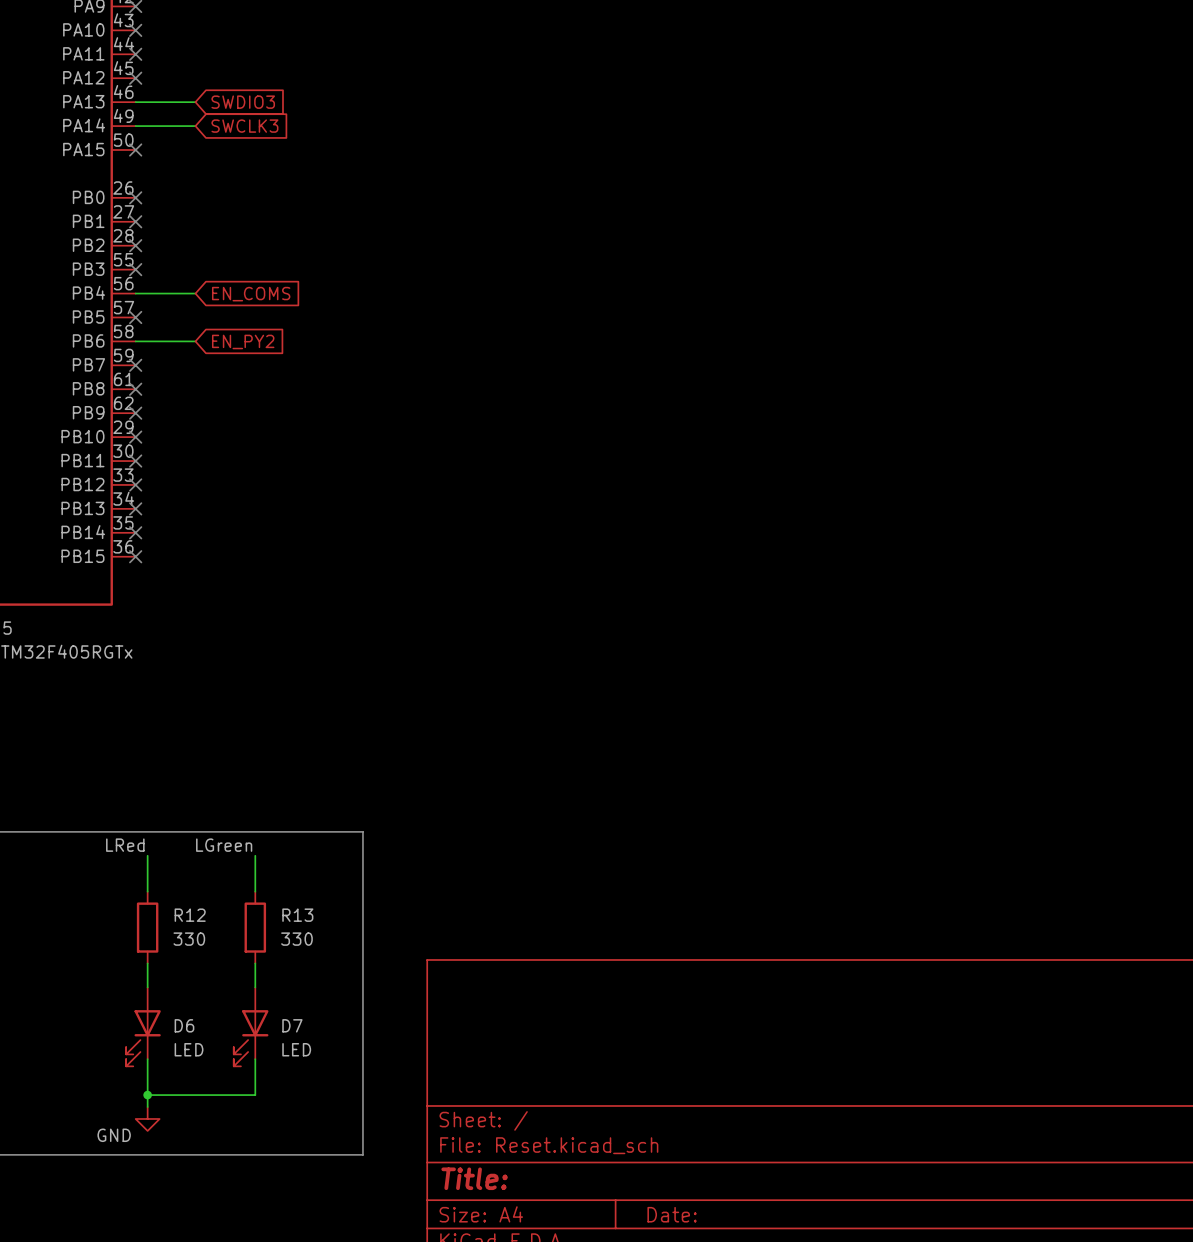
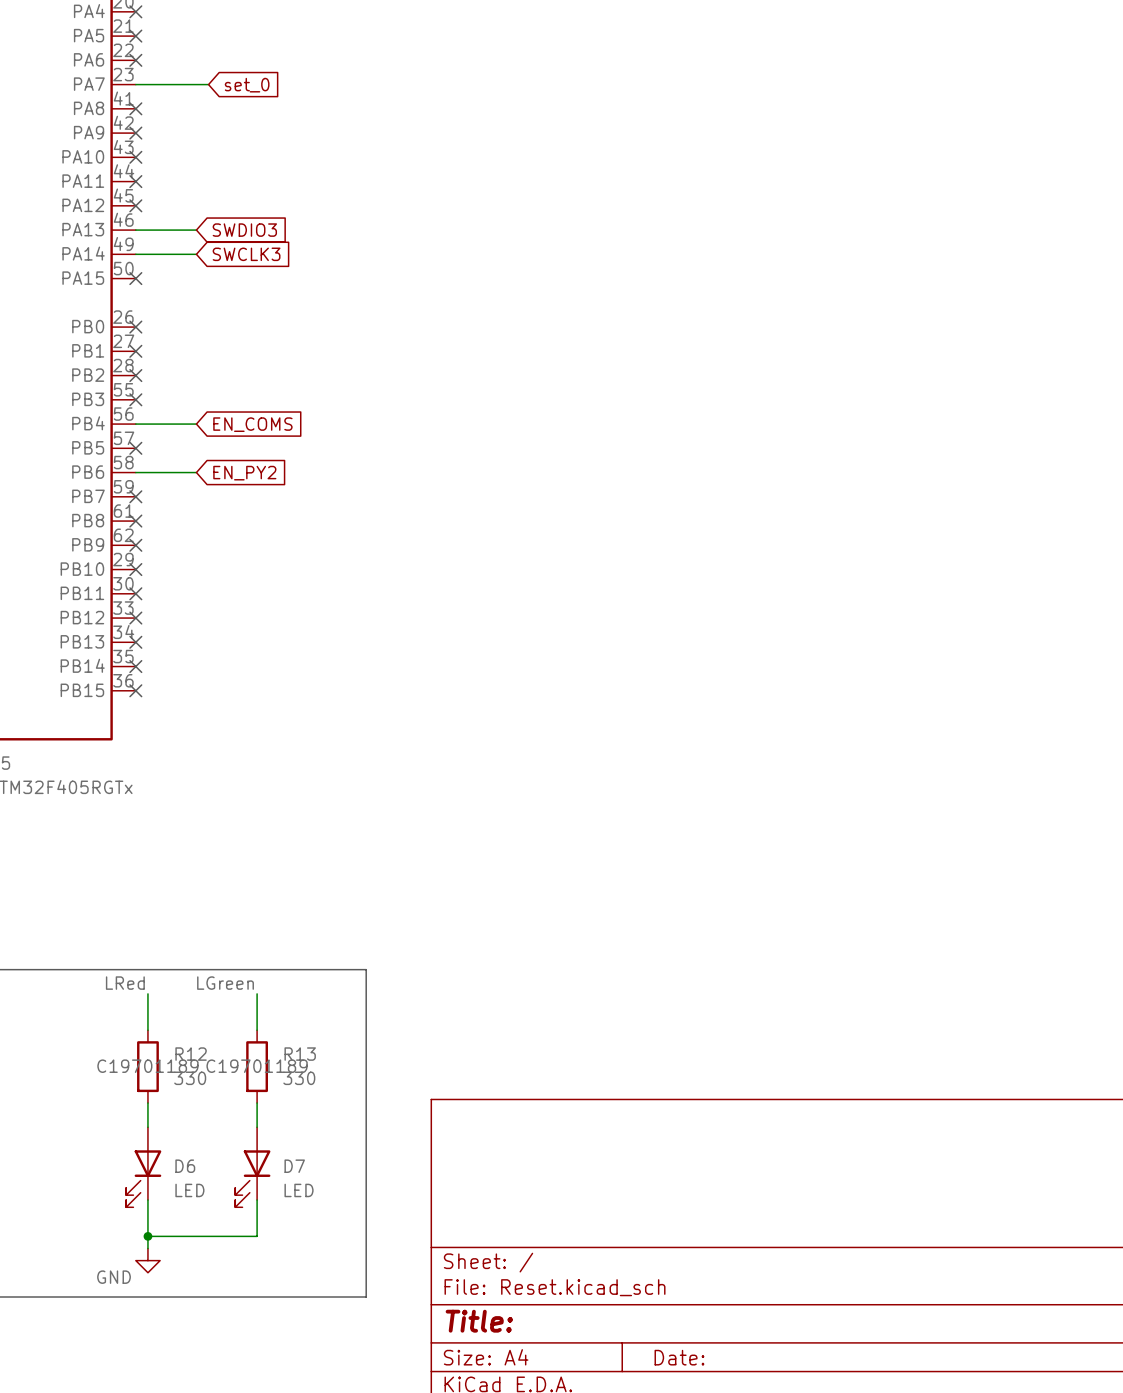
R12 text: none -> C19701189 (147, 1066)
R13 text: none -> C19701189 (257, 1066)

